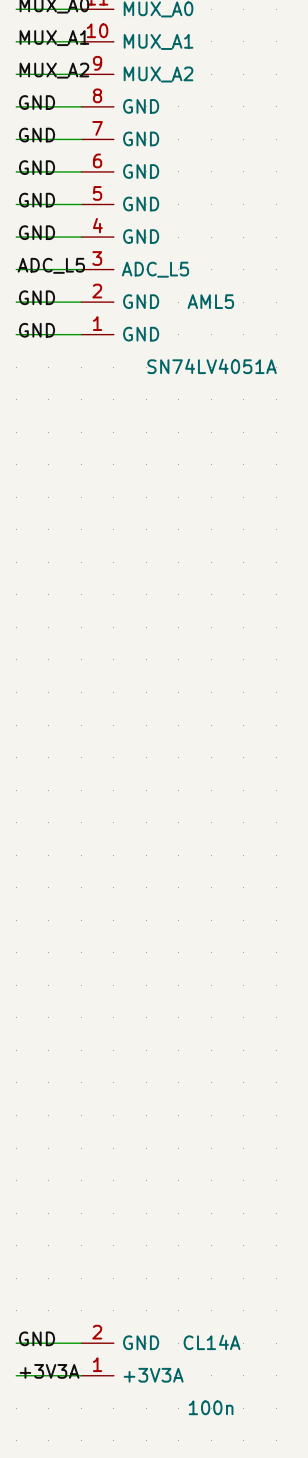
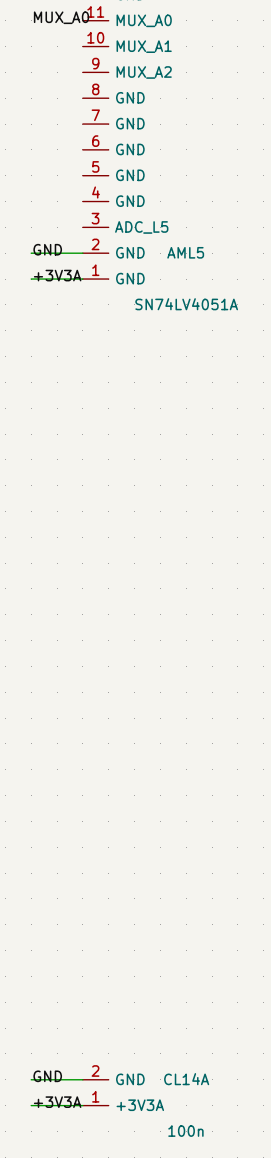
wire: (16, 9) (81, 9) -> none
label: MUX_A1 (54, 38) -> none
wire: (16, 41) (81, 41) -> none
label: MUX_A2 (54, 70) -> none
wire: (16, 74) (81, 74) -> none
label: GND (37, 102) -> none
wire: (16, 106) (81, 106) -> none
label: GND (37, 135) -> none
wire: (16, 139) (81, 139) -> none
label: GND (37, 167) -> none
wire: (16, 171) (81, 171) -> none
label: GND (37, 200) -> none
wire: (16, 204) (81, 204) -> none
label: GND (37, 232) -> none
wire: (16, 237) (81, 237) -> none
label: ADC_L5 (51, 265) -> none
wire: (16, 269) (81, 269) -> none
label: GND (37, 330) -> +3V3A (57, 275)

